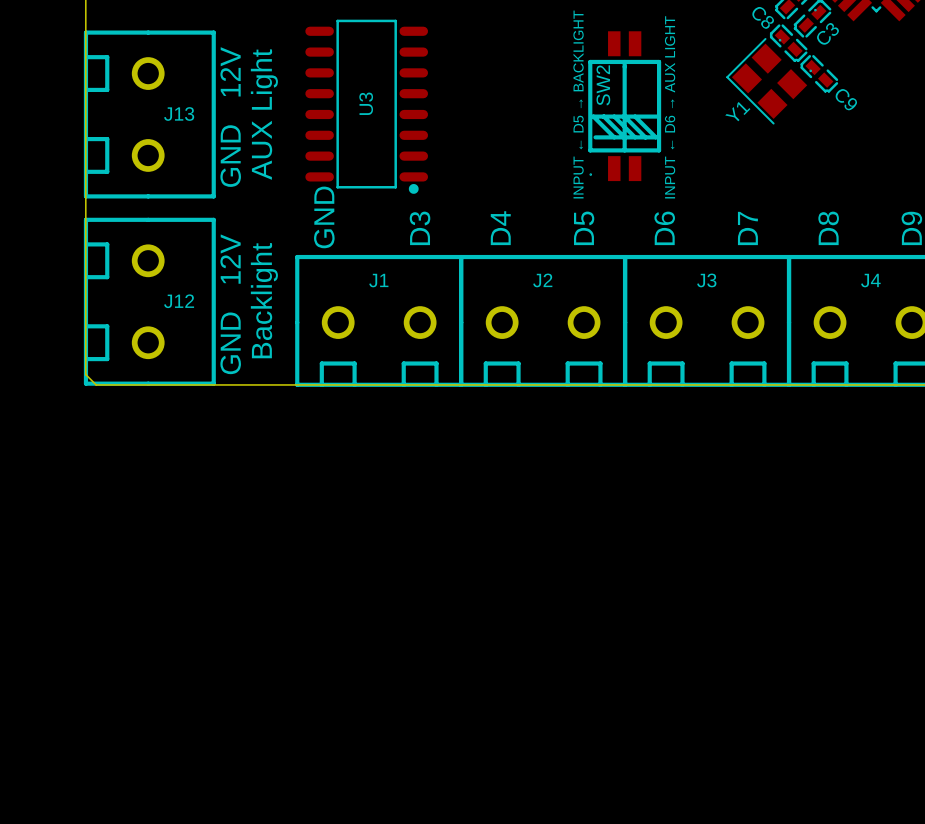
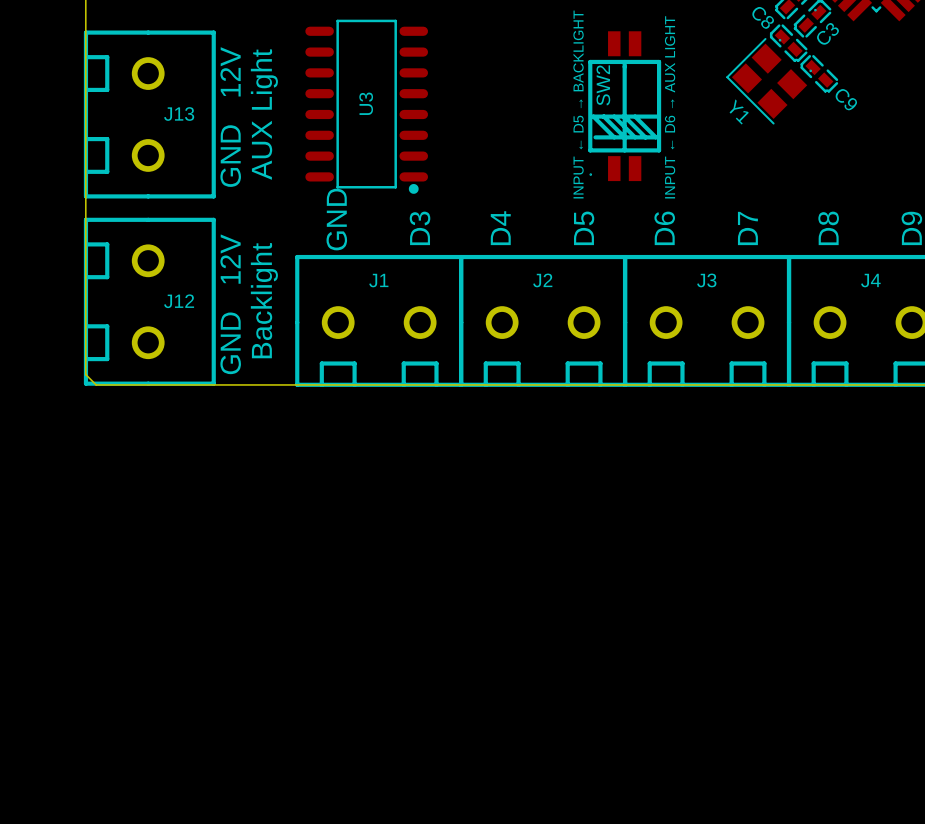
Y1 name rotation: 0° (737, 111) -> 90° clockwise (739, 111)
J1 text: GND (324, 217) -> none
text: none -> GND (336, 219)

